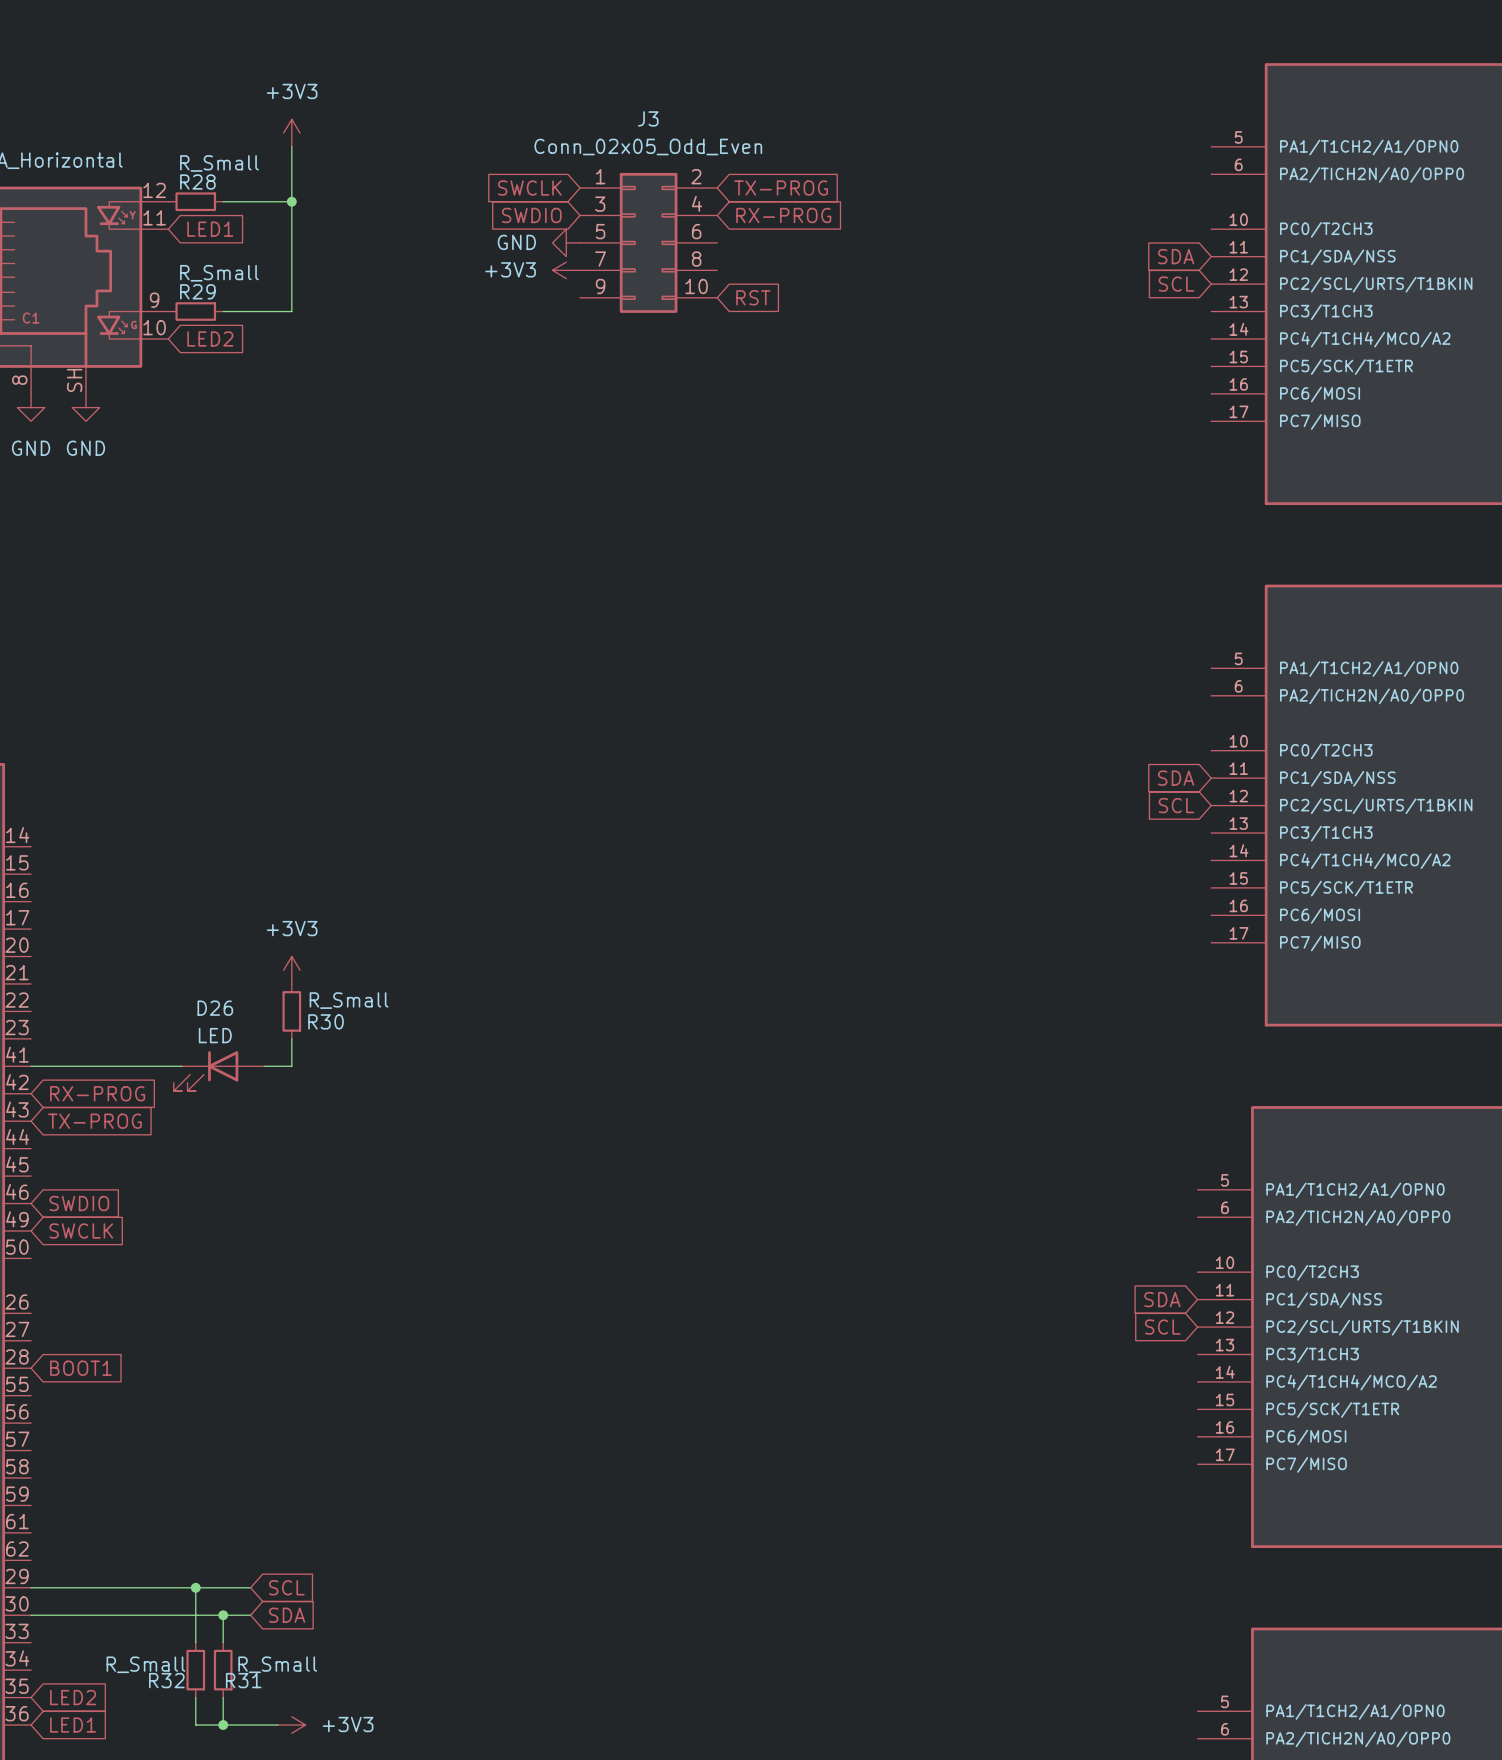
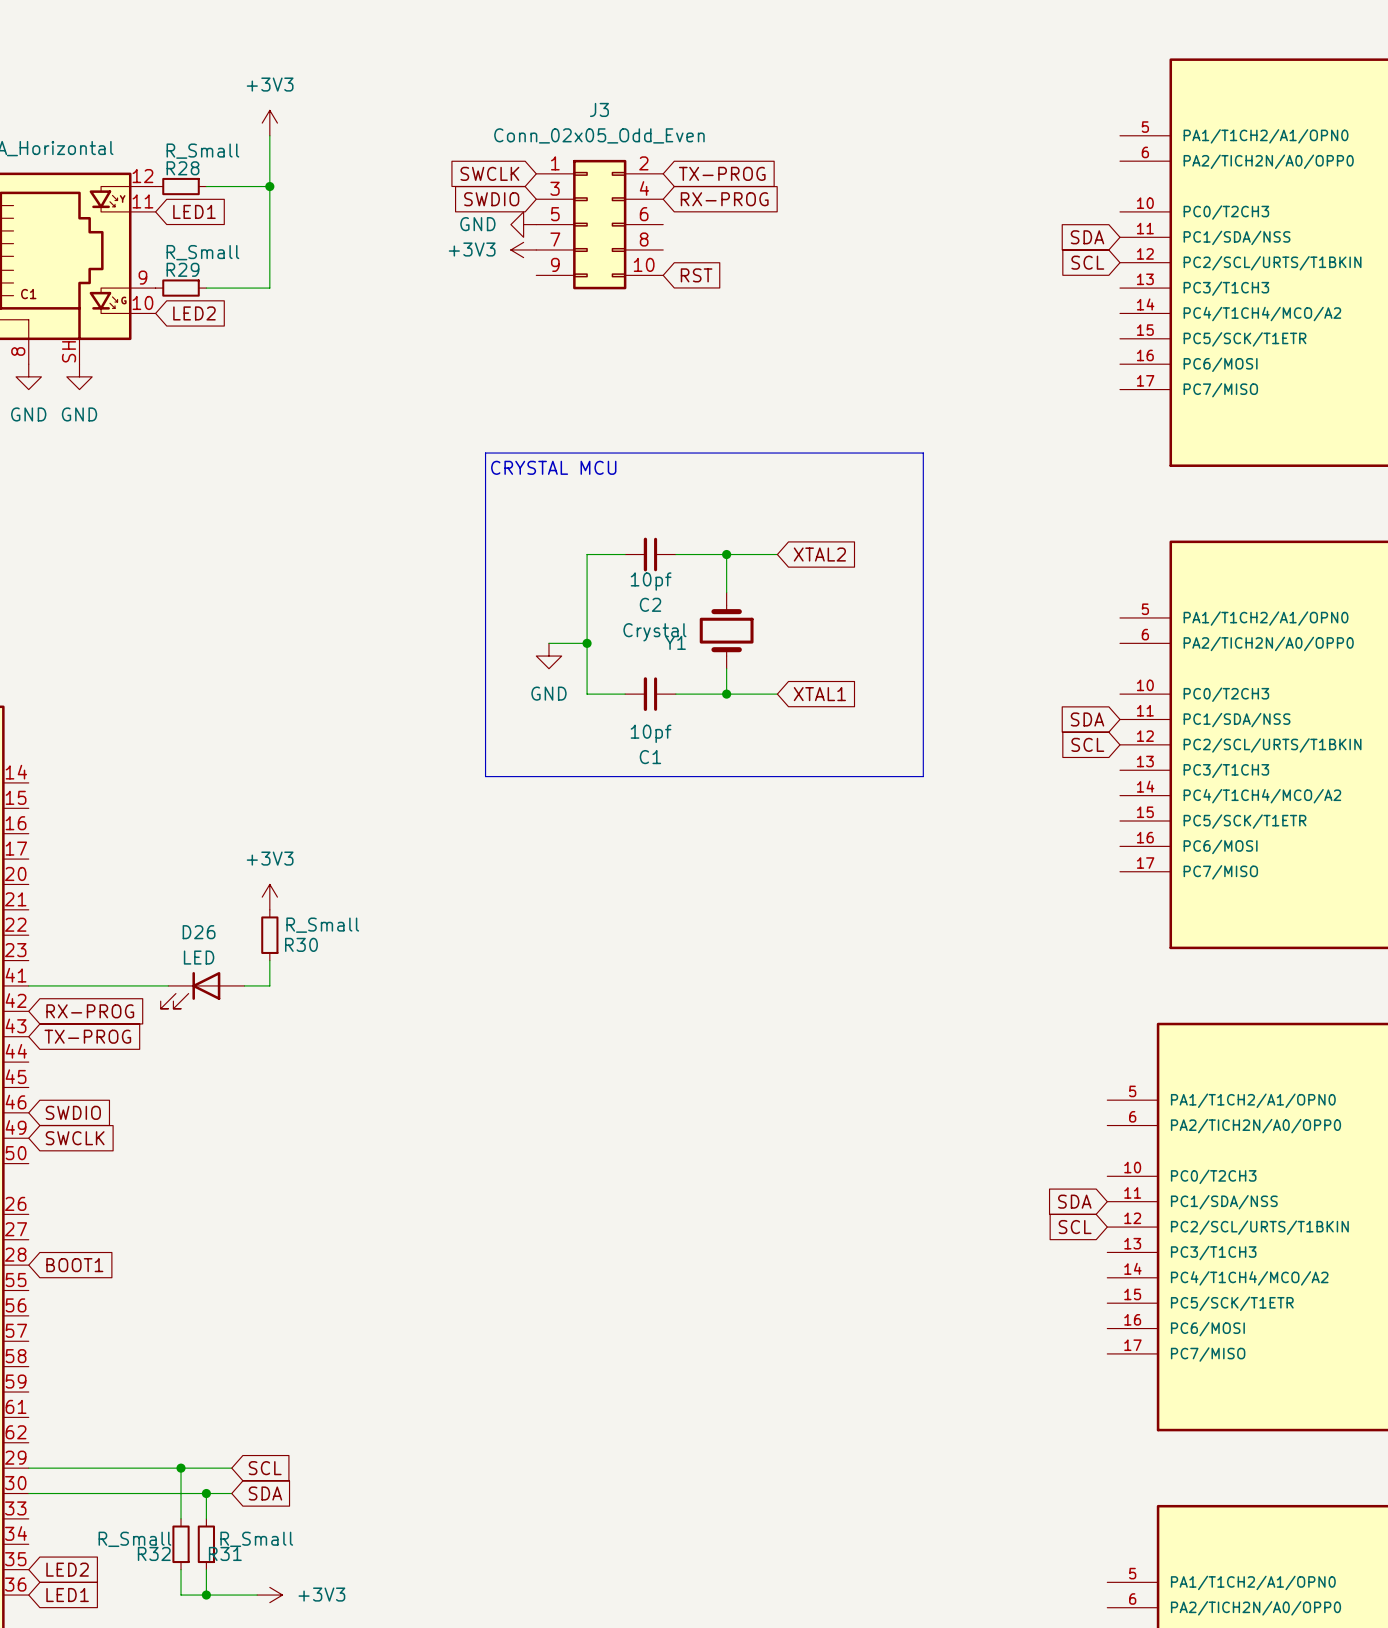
line: none -> (485, 453) (923, 453) (923, 776) (485, 776) (485, 453)
text: none -> CRYSTAL MCU (553, 467)
wire: none -> (625, 554) (587, 554) (587, 694) (625, 694)
C2: none -> 10pf (650, 554)
wire: none -> (675, 554) (777, 554)
wire: none -> (726, 554) (726, 592)
junction: none -> (726, 554)
global label: none -> XTAL2 (819, 554)
Y1: none -> Crystal (726, 630)
wire: none -> (548, 643) (587, 643)
junction: none -> (587, 643)
power symbol: none -> GND (548, 656)
wire: none -> (726, 668) (726, 694)
C1: none -> 10pf (650, 694)
wire: none -> (675, 694) (777, 694)
junction: none -> (726, 694)
global label: none -> XTAL1 (819, 694)

